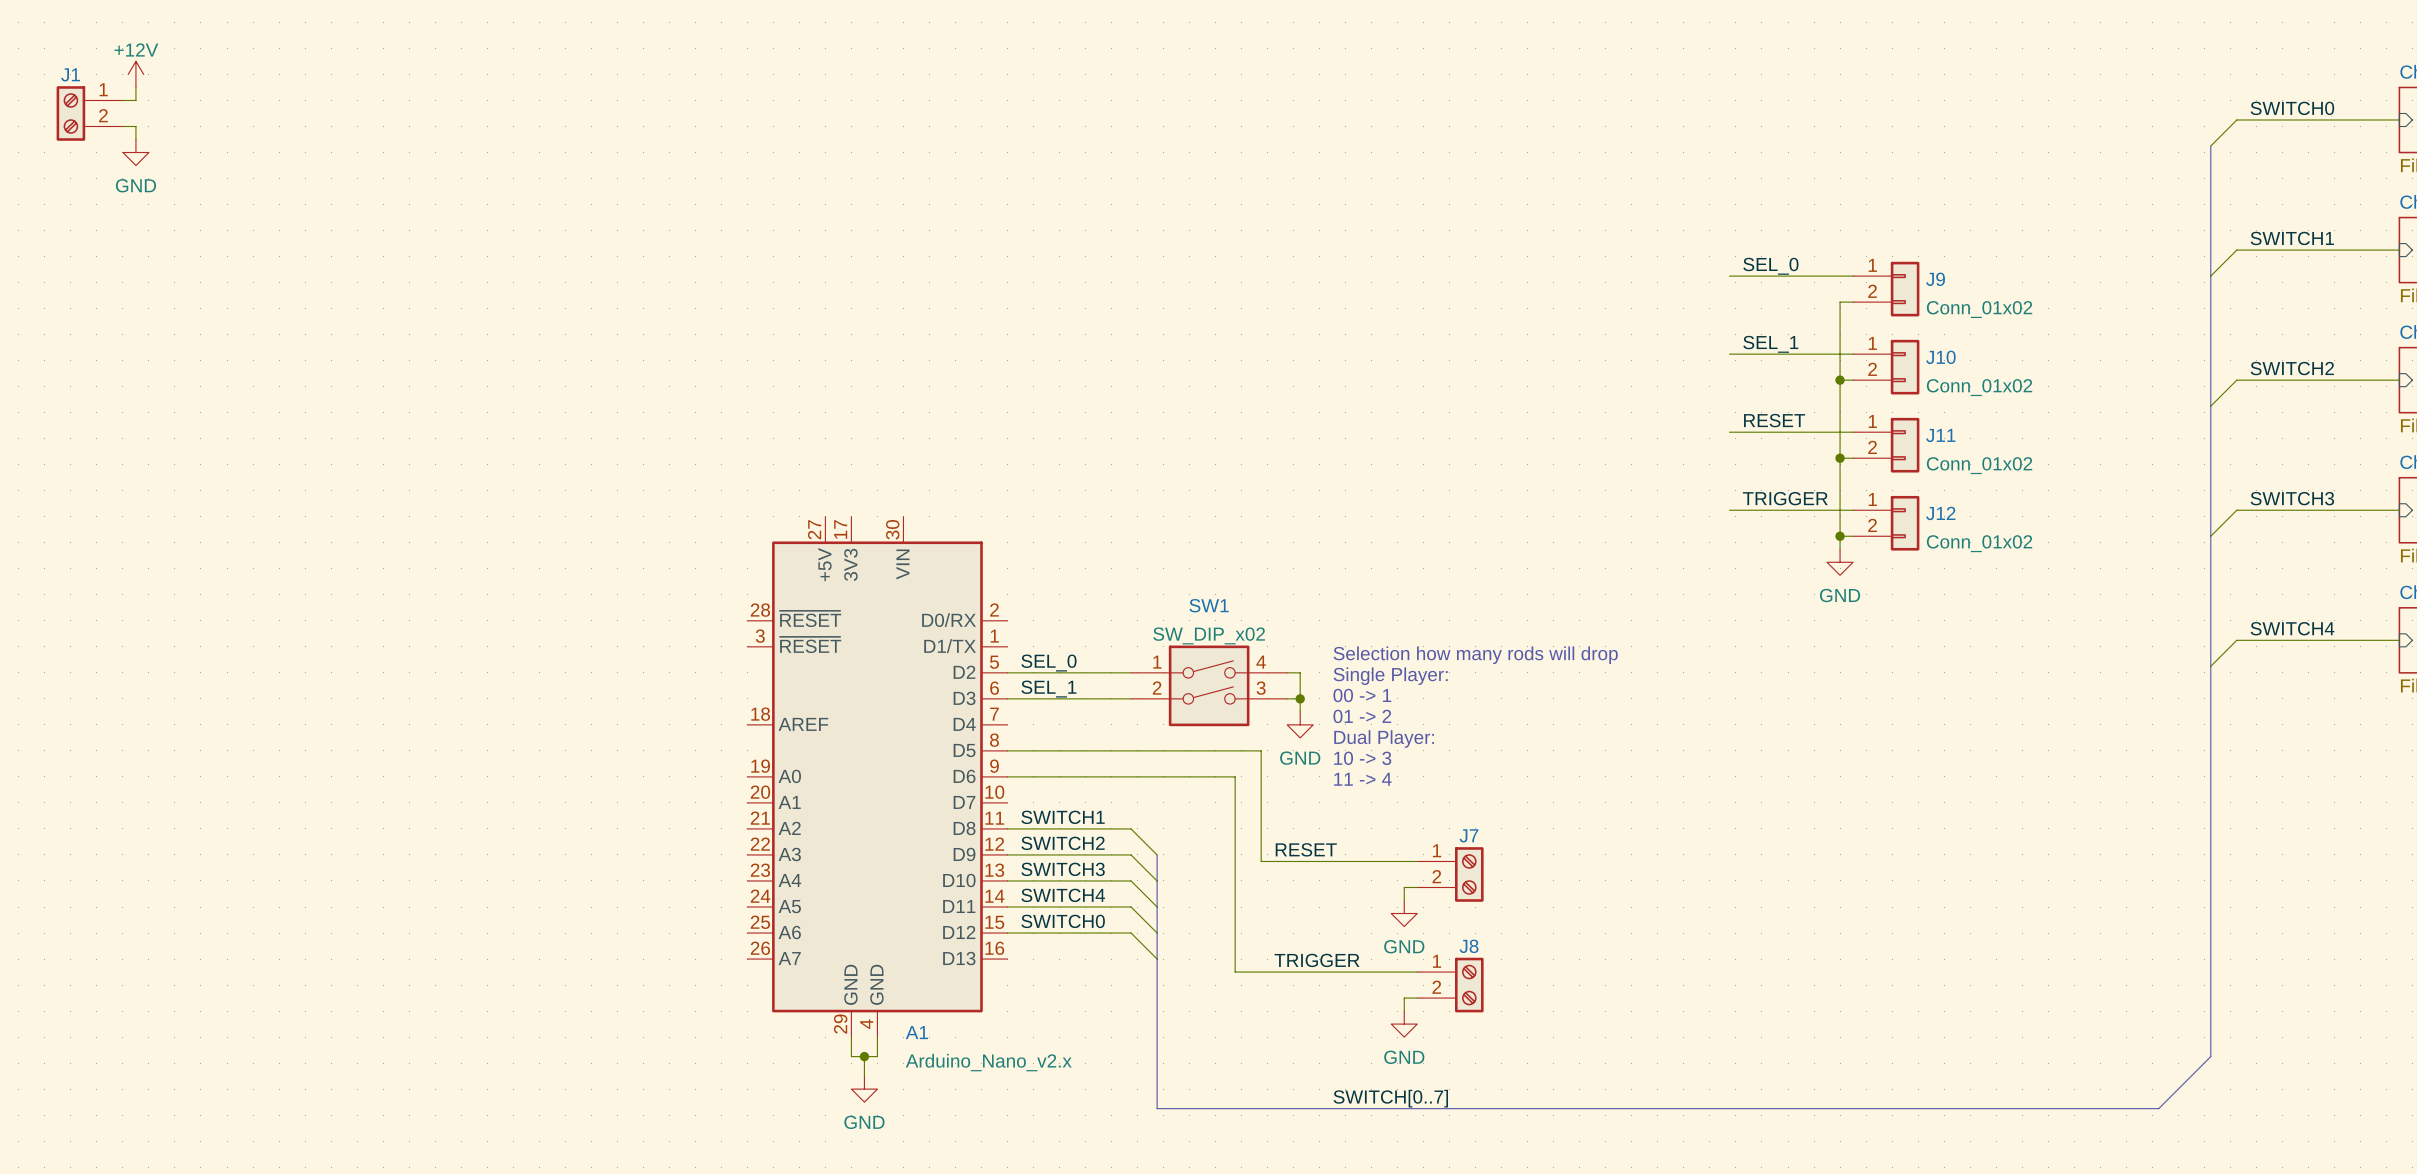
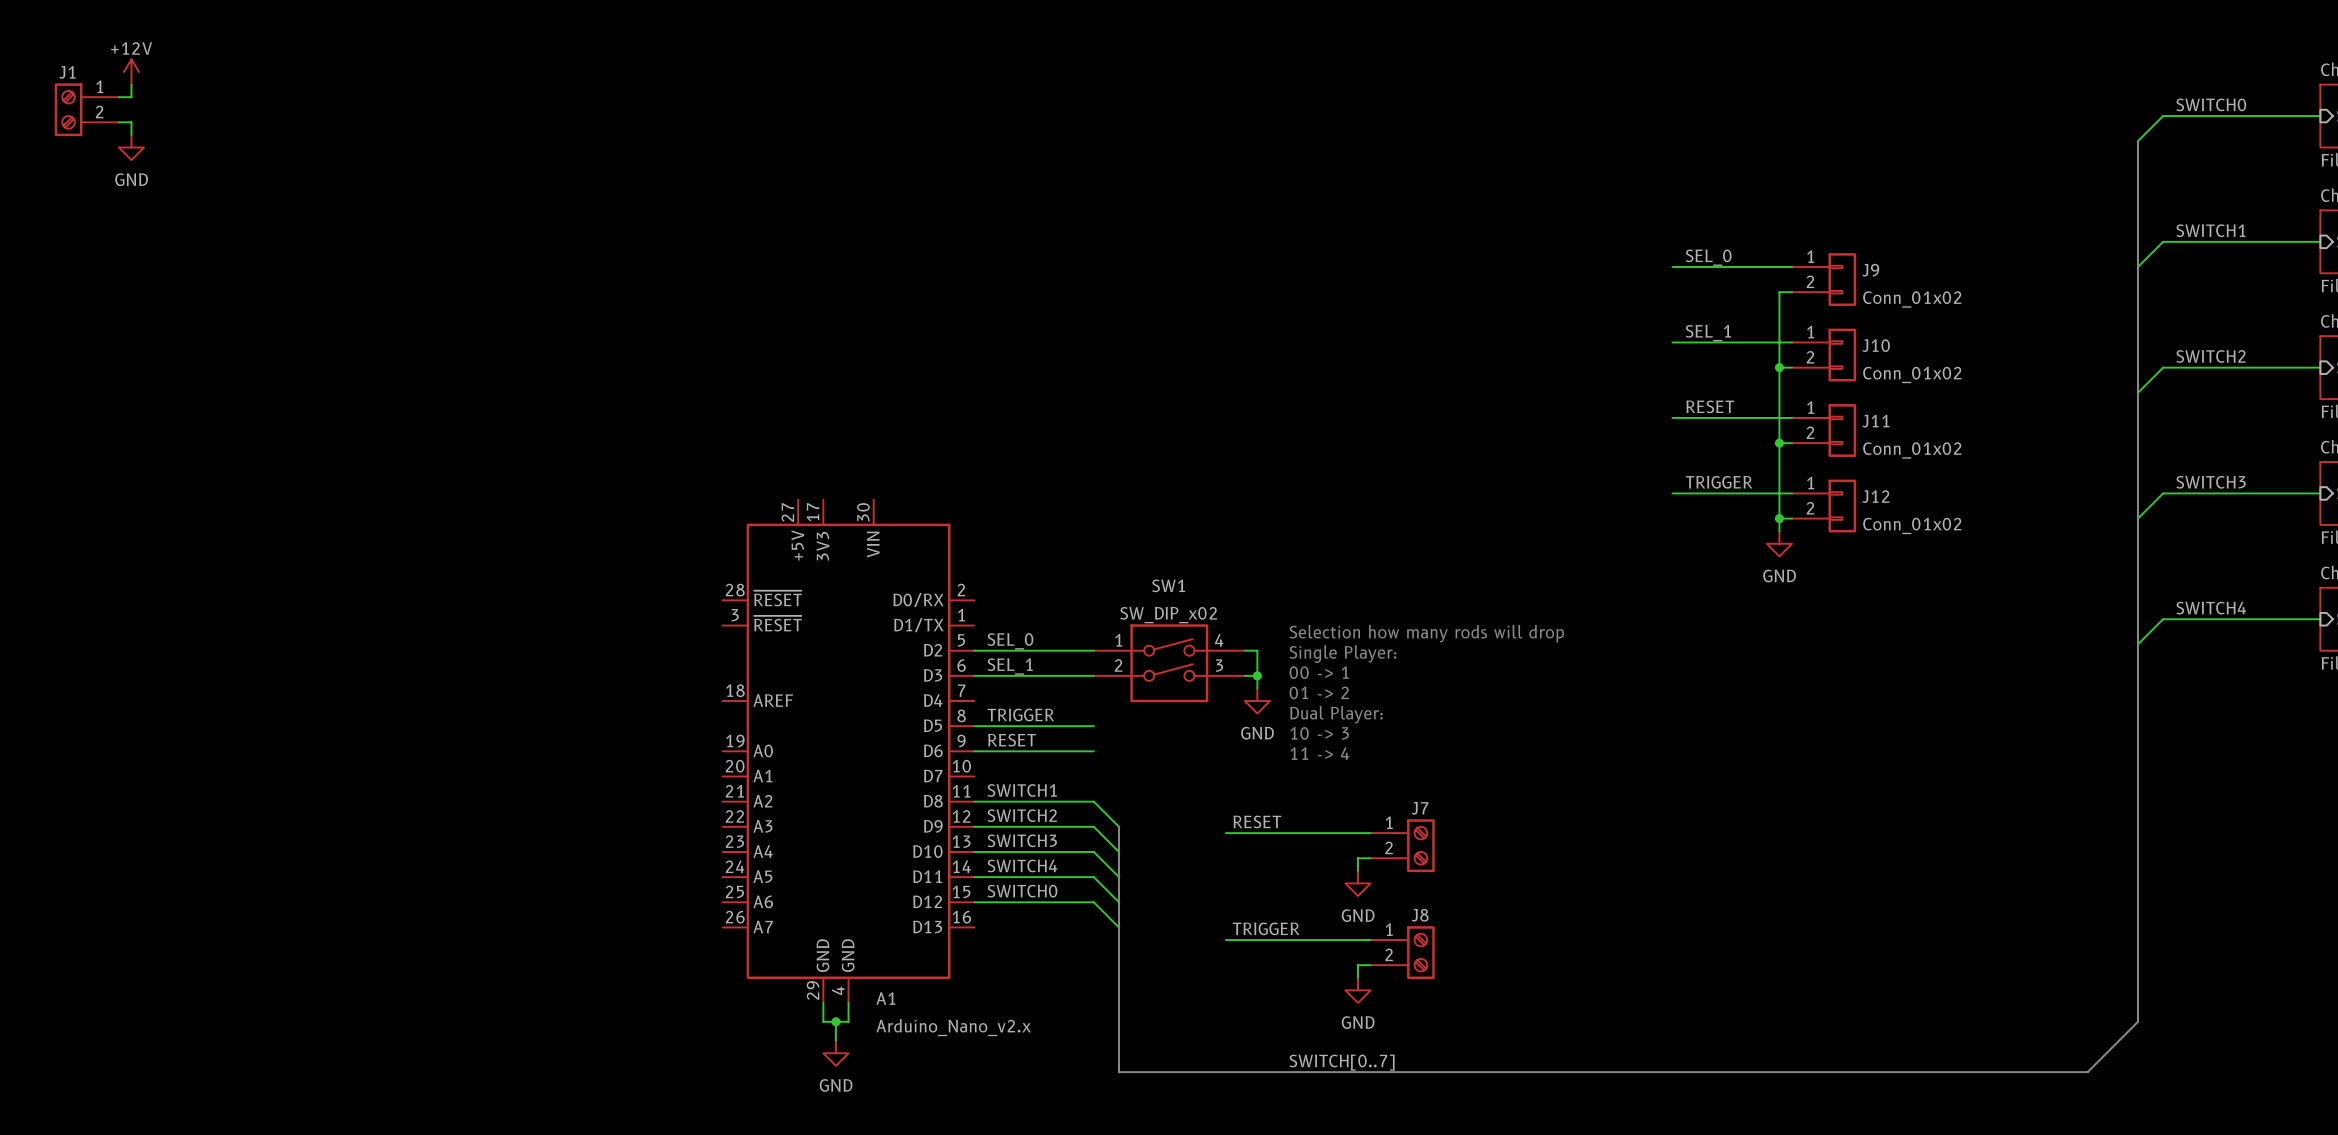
label: none -> TRIGGER (1020, 715)
wire: (1131, 750) (1261, 750) (1261, 861) (1267, 861) -> none
label: none -> RESET (1012, 740)
wire: (1131, 776) (1235, 776) (1235, 972) (1267, 972) -> none

